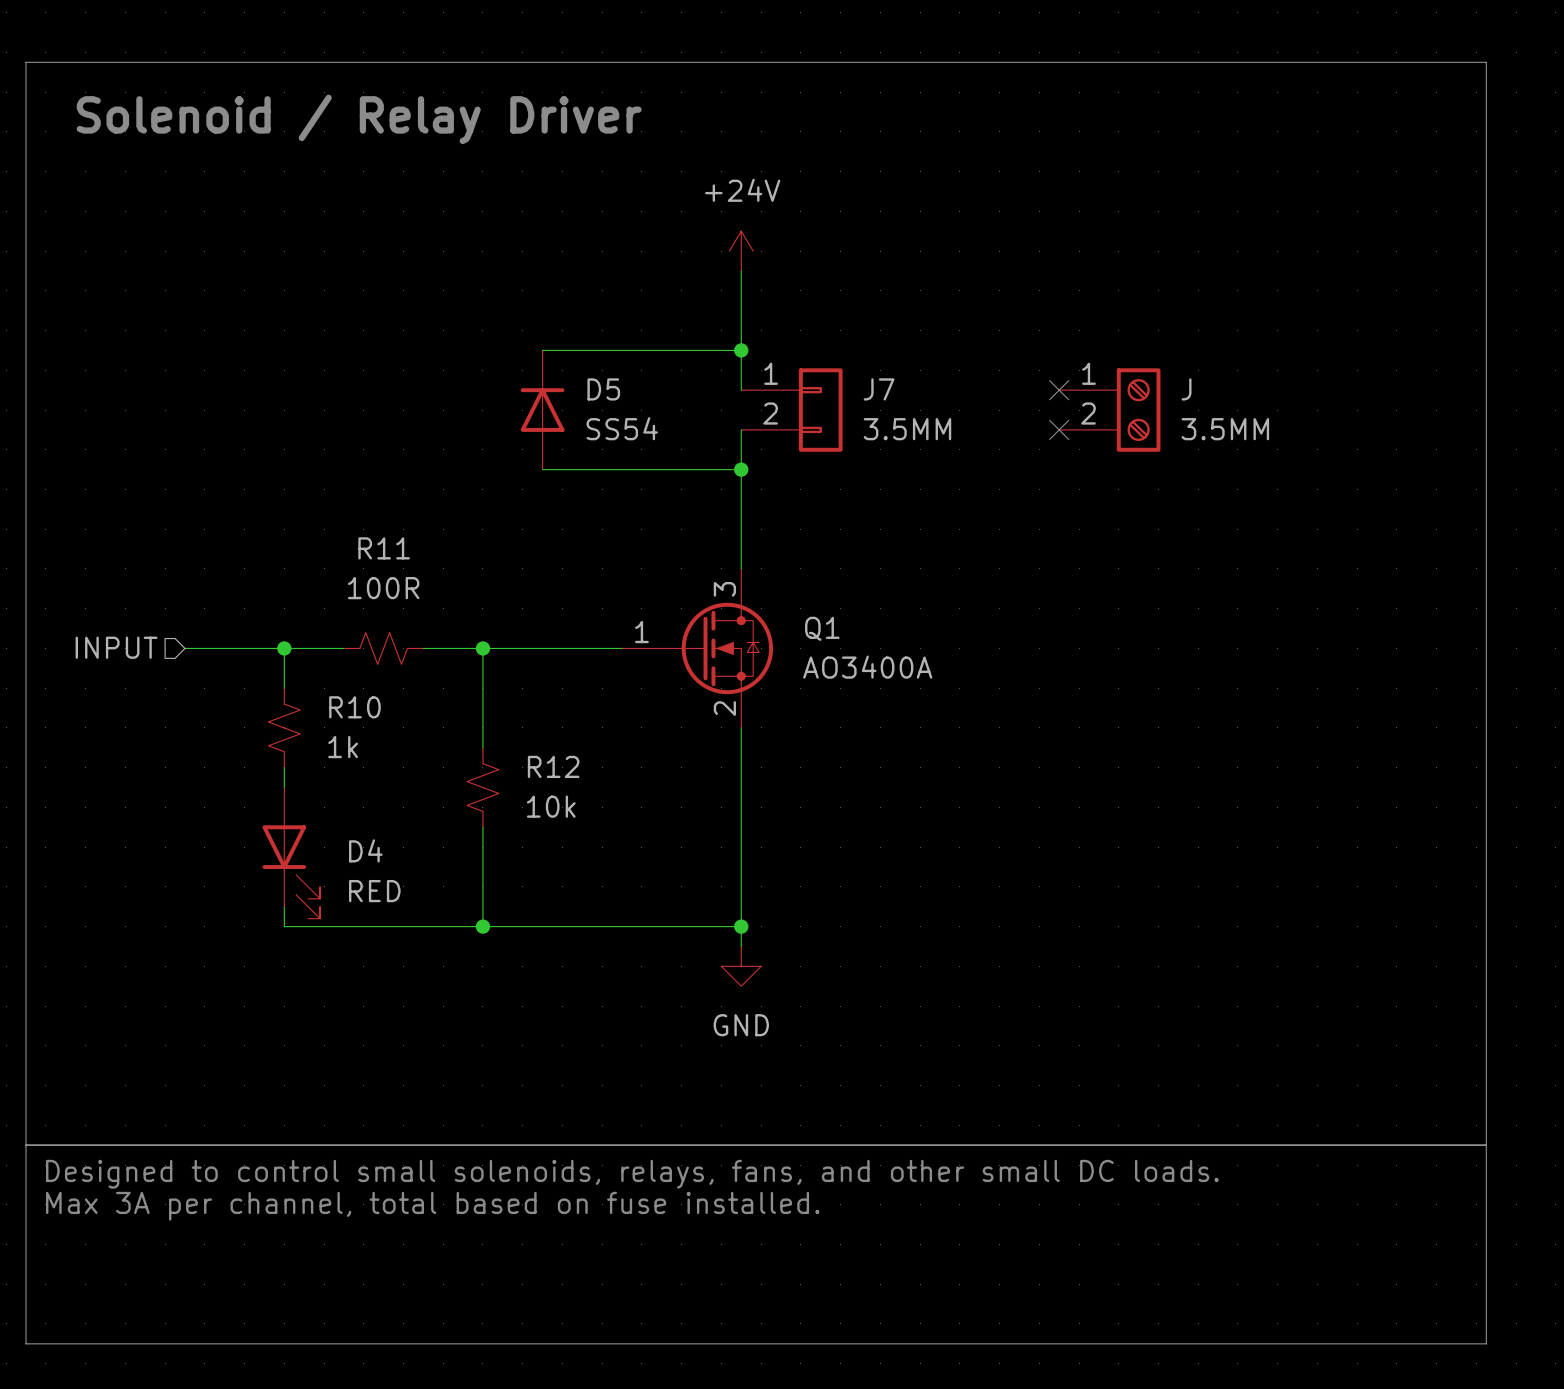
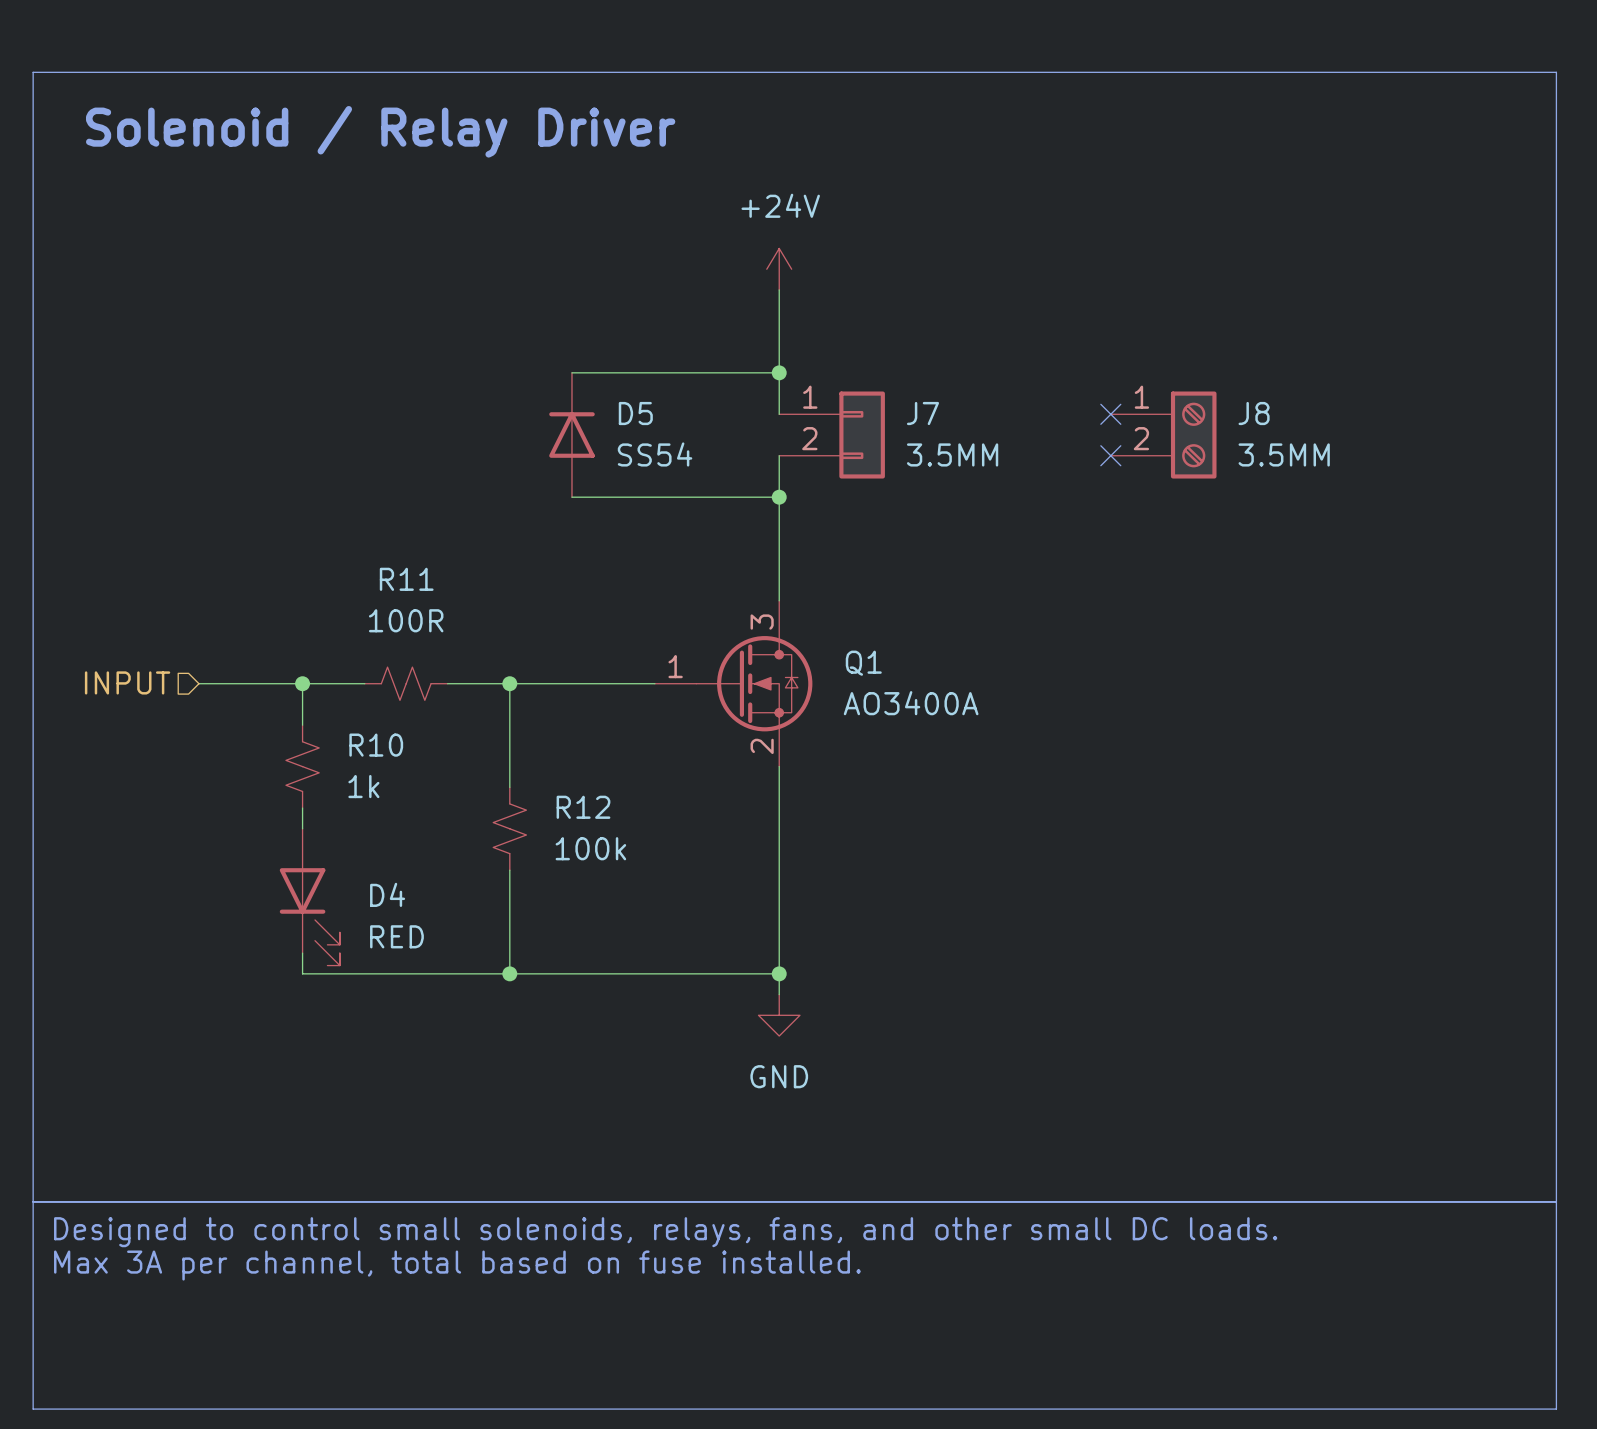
J name: J (1186, 389) -> J8 (1254, 413)
R12 value: 10k (551, 806) -> 100k (590, 848)

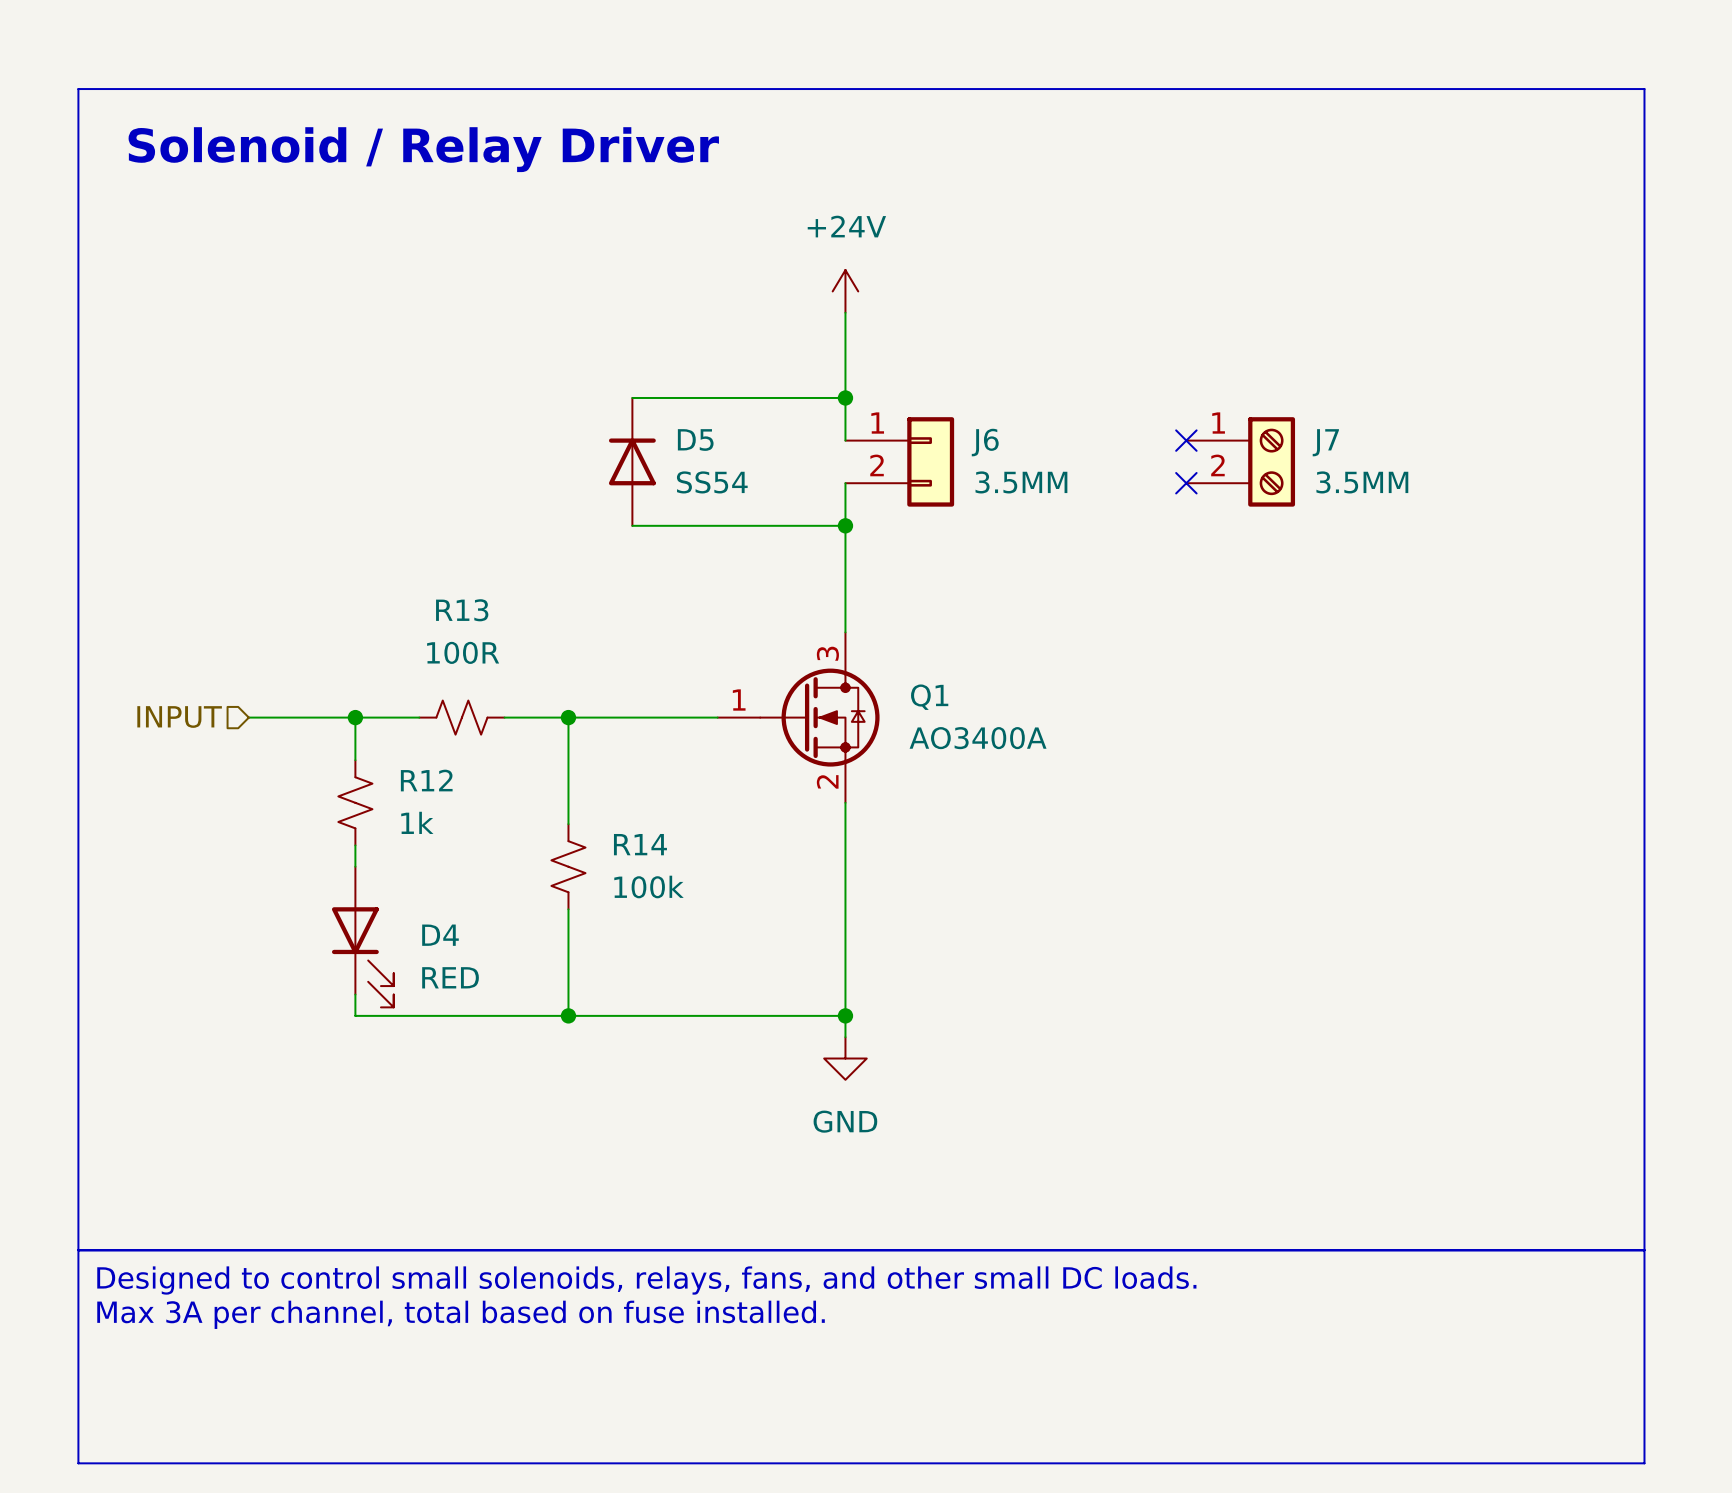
J7 name: J7 (922, 413) -> J6 (985, 442)
J8 name: J8 (1254, 413) -> J7 (1325, 442)
R11 name: R11 (406, 579) -> R13 (462, 610)
R10 name: R10 (376, 745) -> R12 (426, 780)
R12 name: R12 (583, 807) -> R14 (640, 844)

